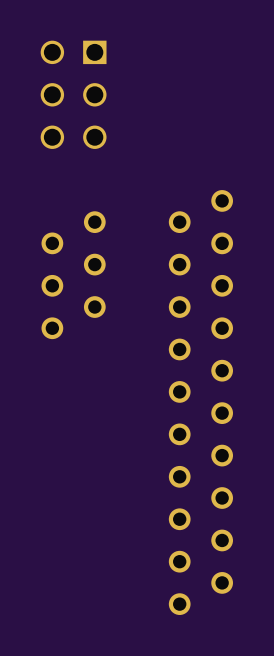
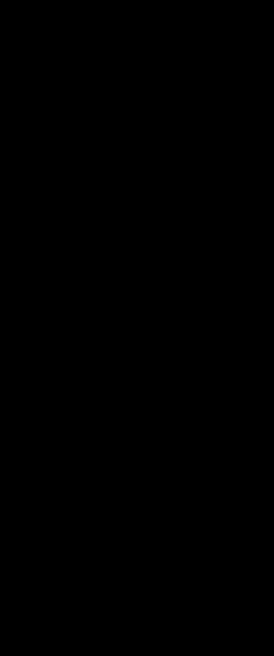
part: (73, 94) -> none
part: (73, 275) -> none
part: (200, 402) -> none

